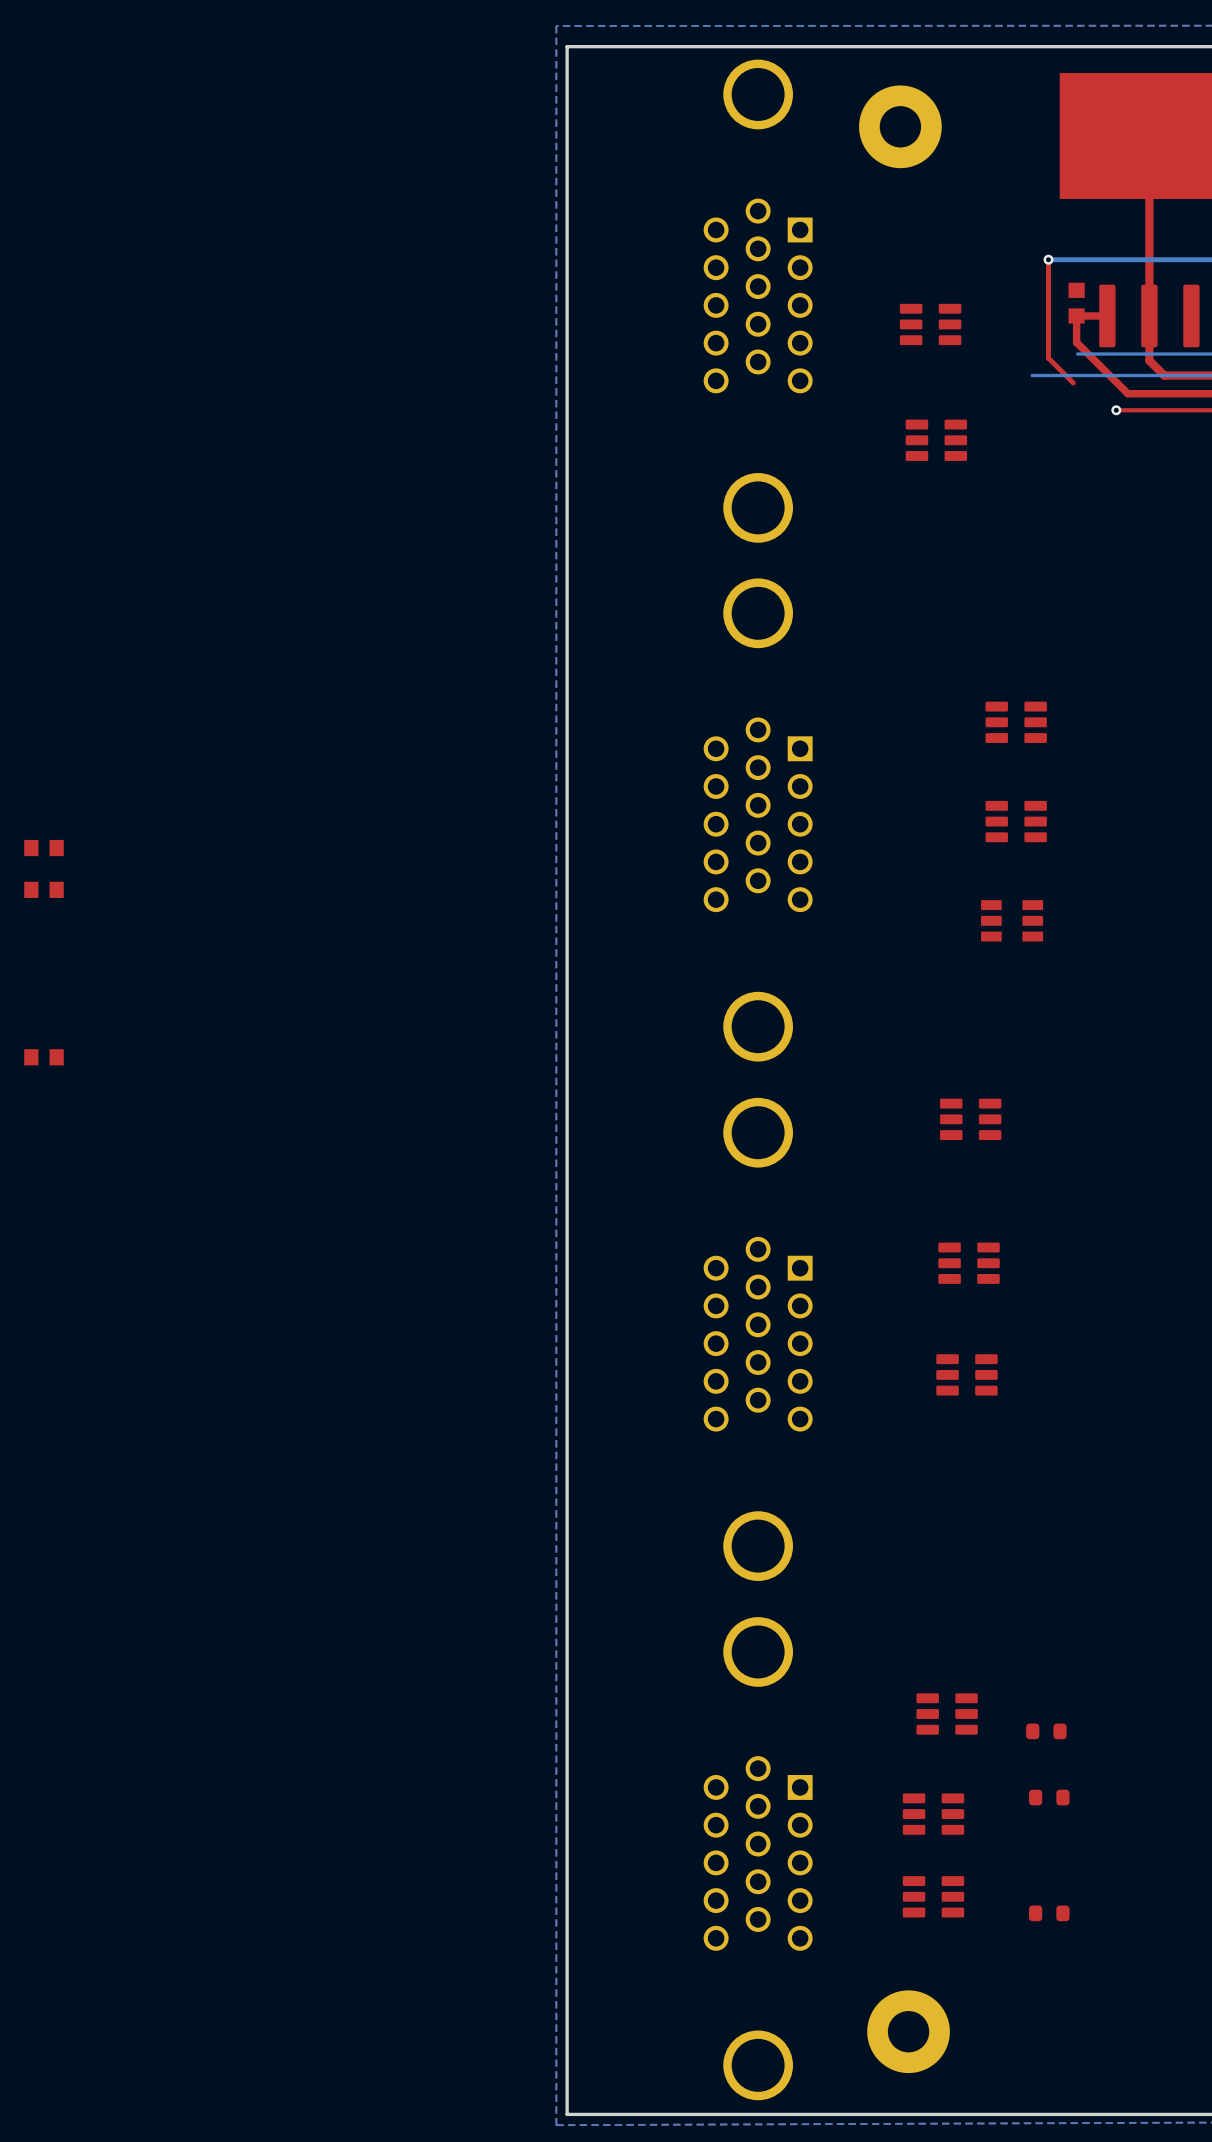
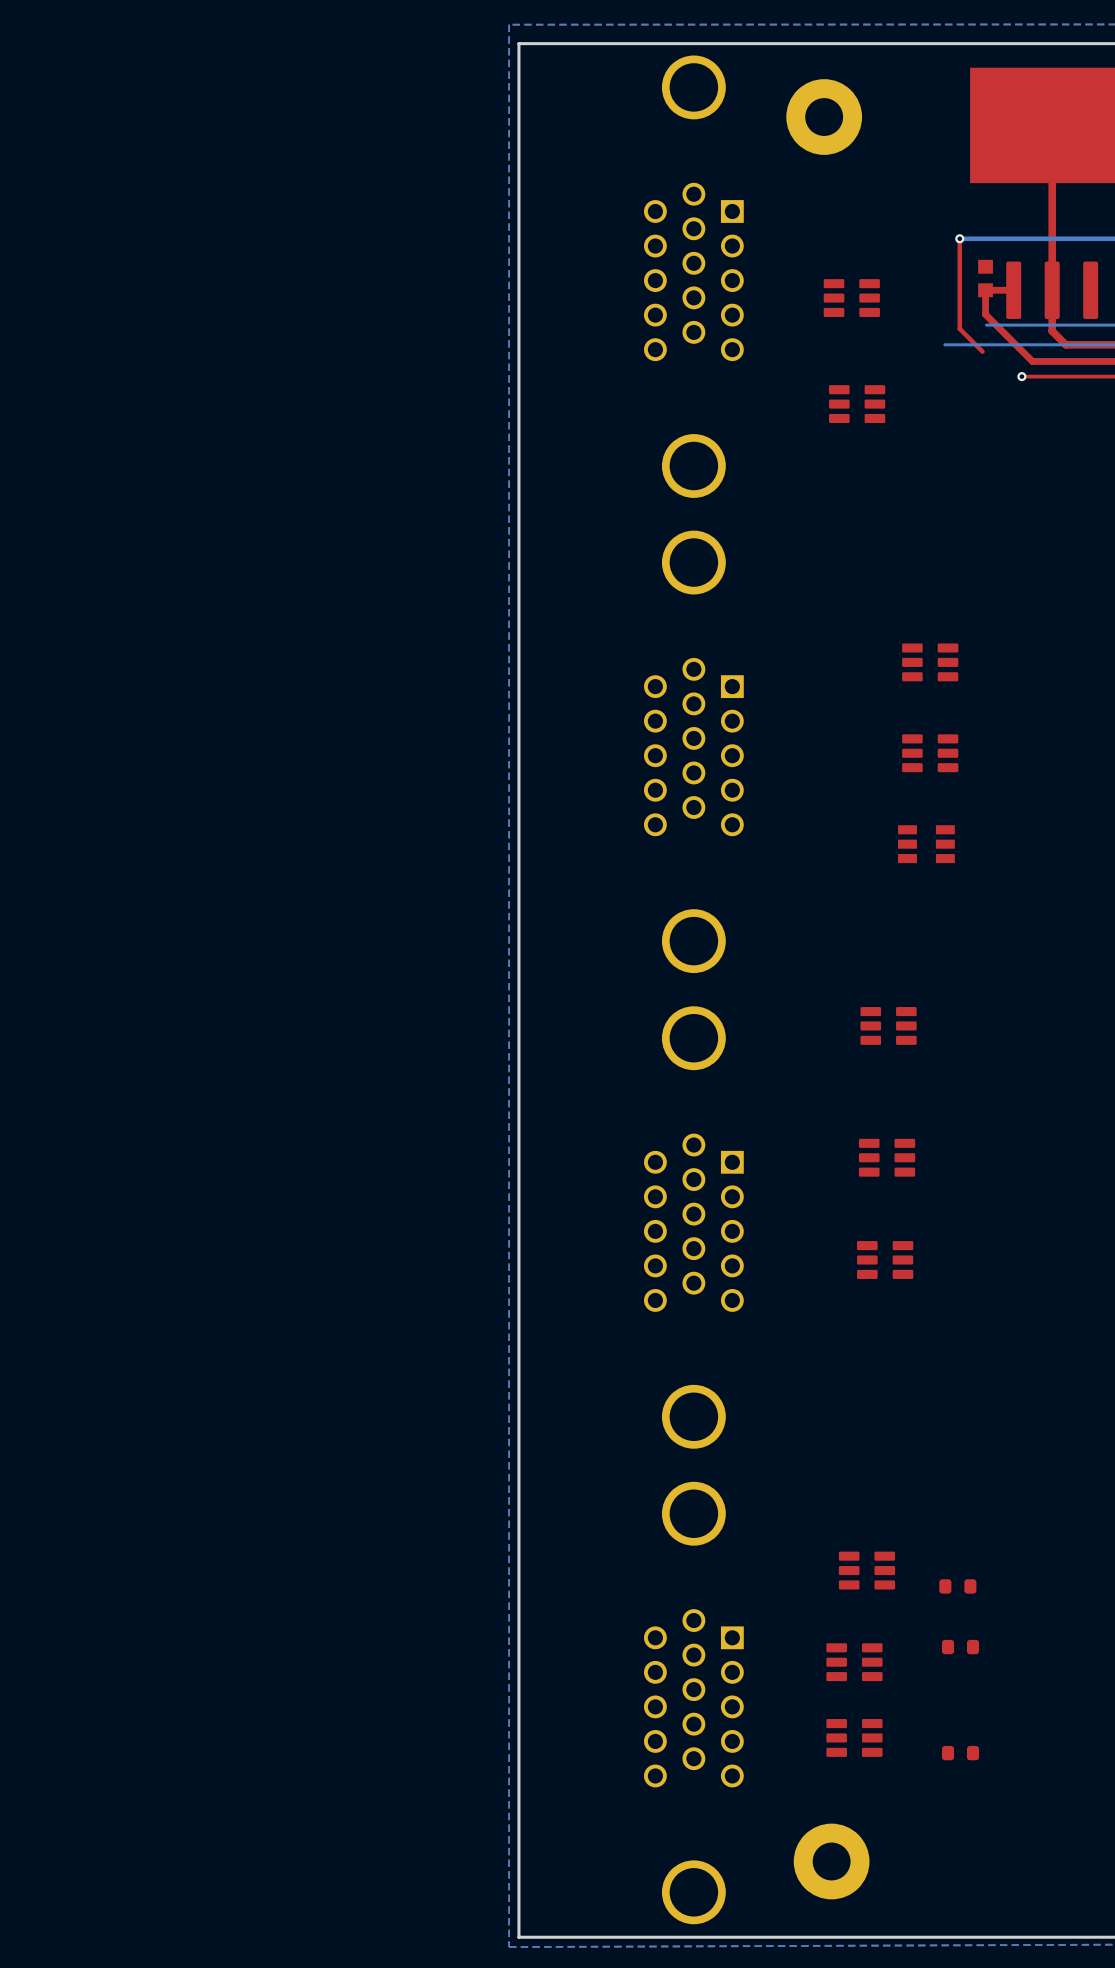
part: (43, 848) -> none
part: (43, 889) -> none
part: (43, 1057) -> none

